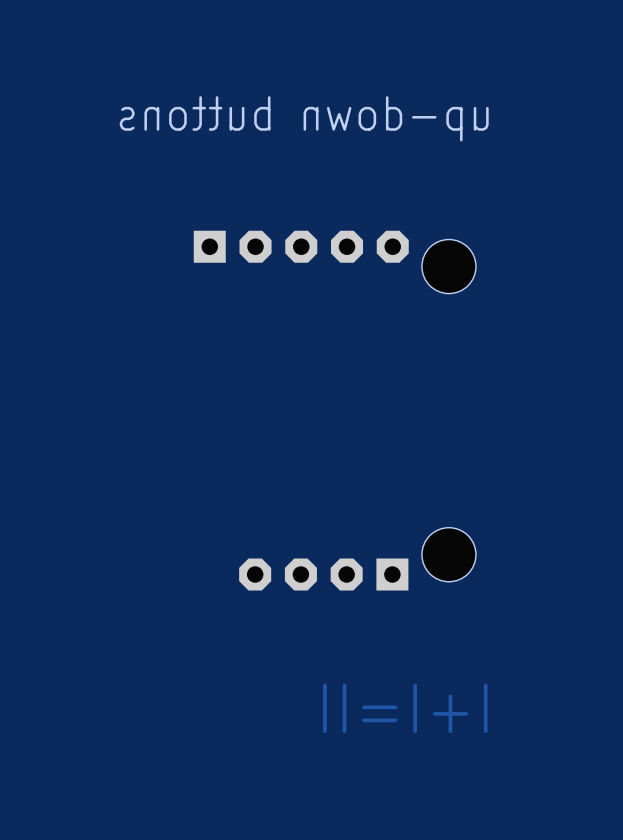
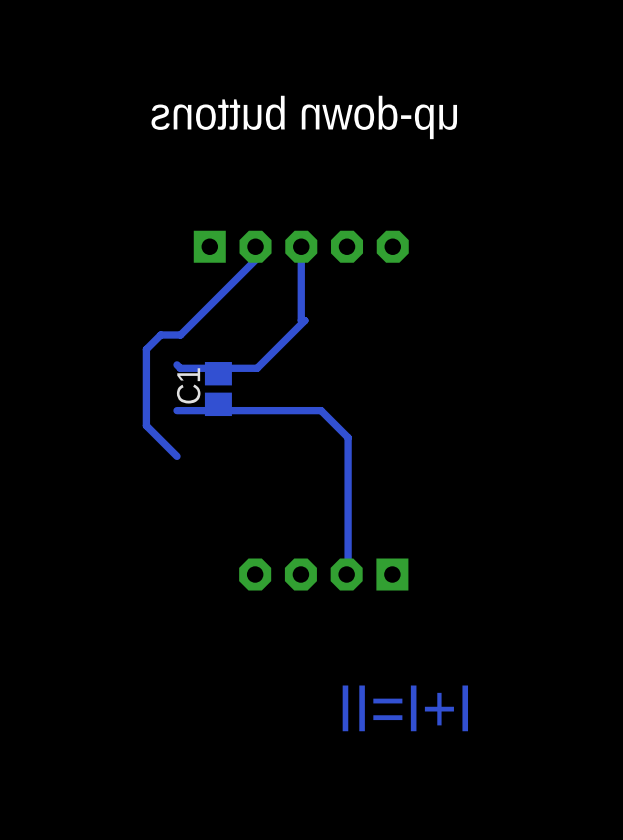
track: none -> (255, 246) (256, 259) (180, 334) (160, 334) (146, 349) (146, 425) (177, 456)
track: none -> (301, 246) (301, 320) (304, 320) (257, 368) (180, 368) (177, 364)
hole: (448, 266) -> none
C1: none -> (218, 389)
track: none -> (177, 410) (321, 410) (348, 437) (348, 572)
hole: (448, 554) -> none

